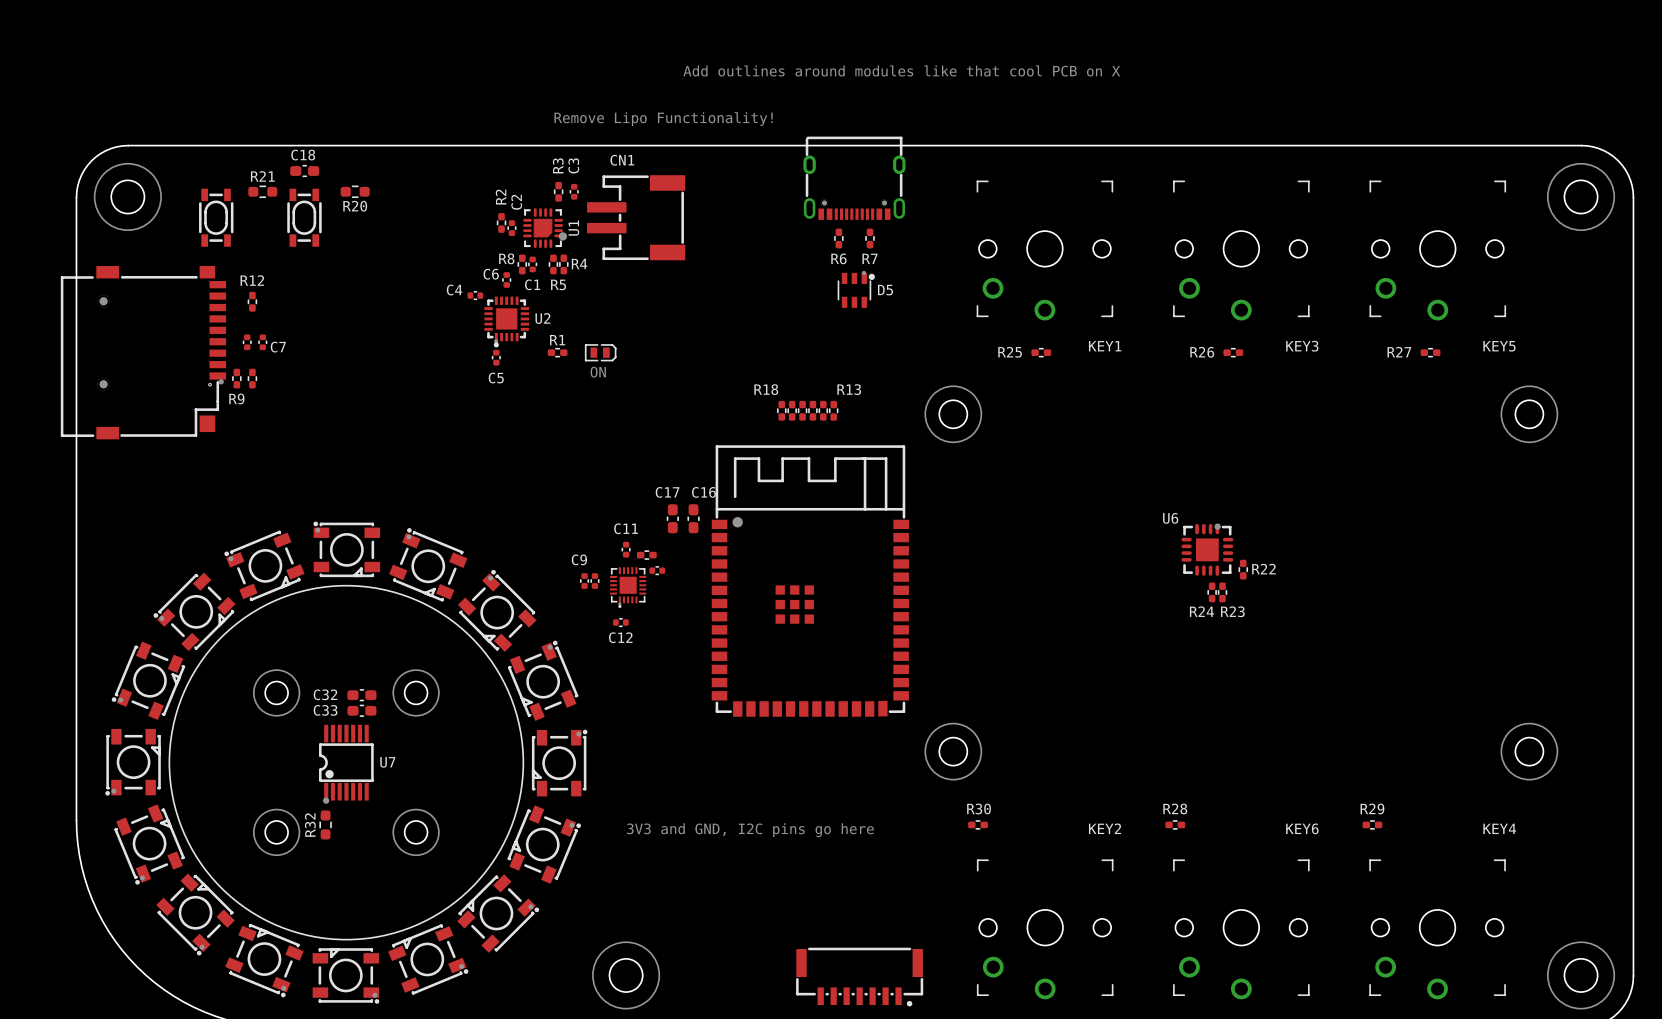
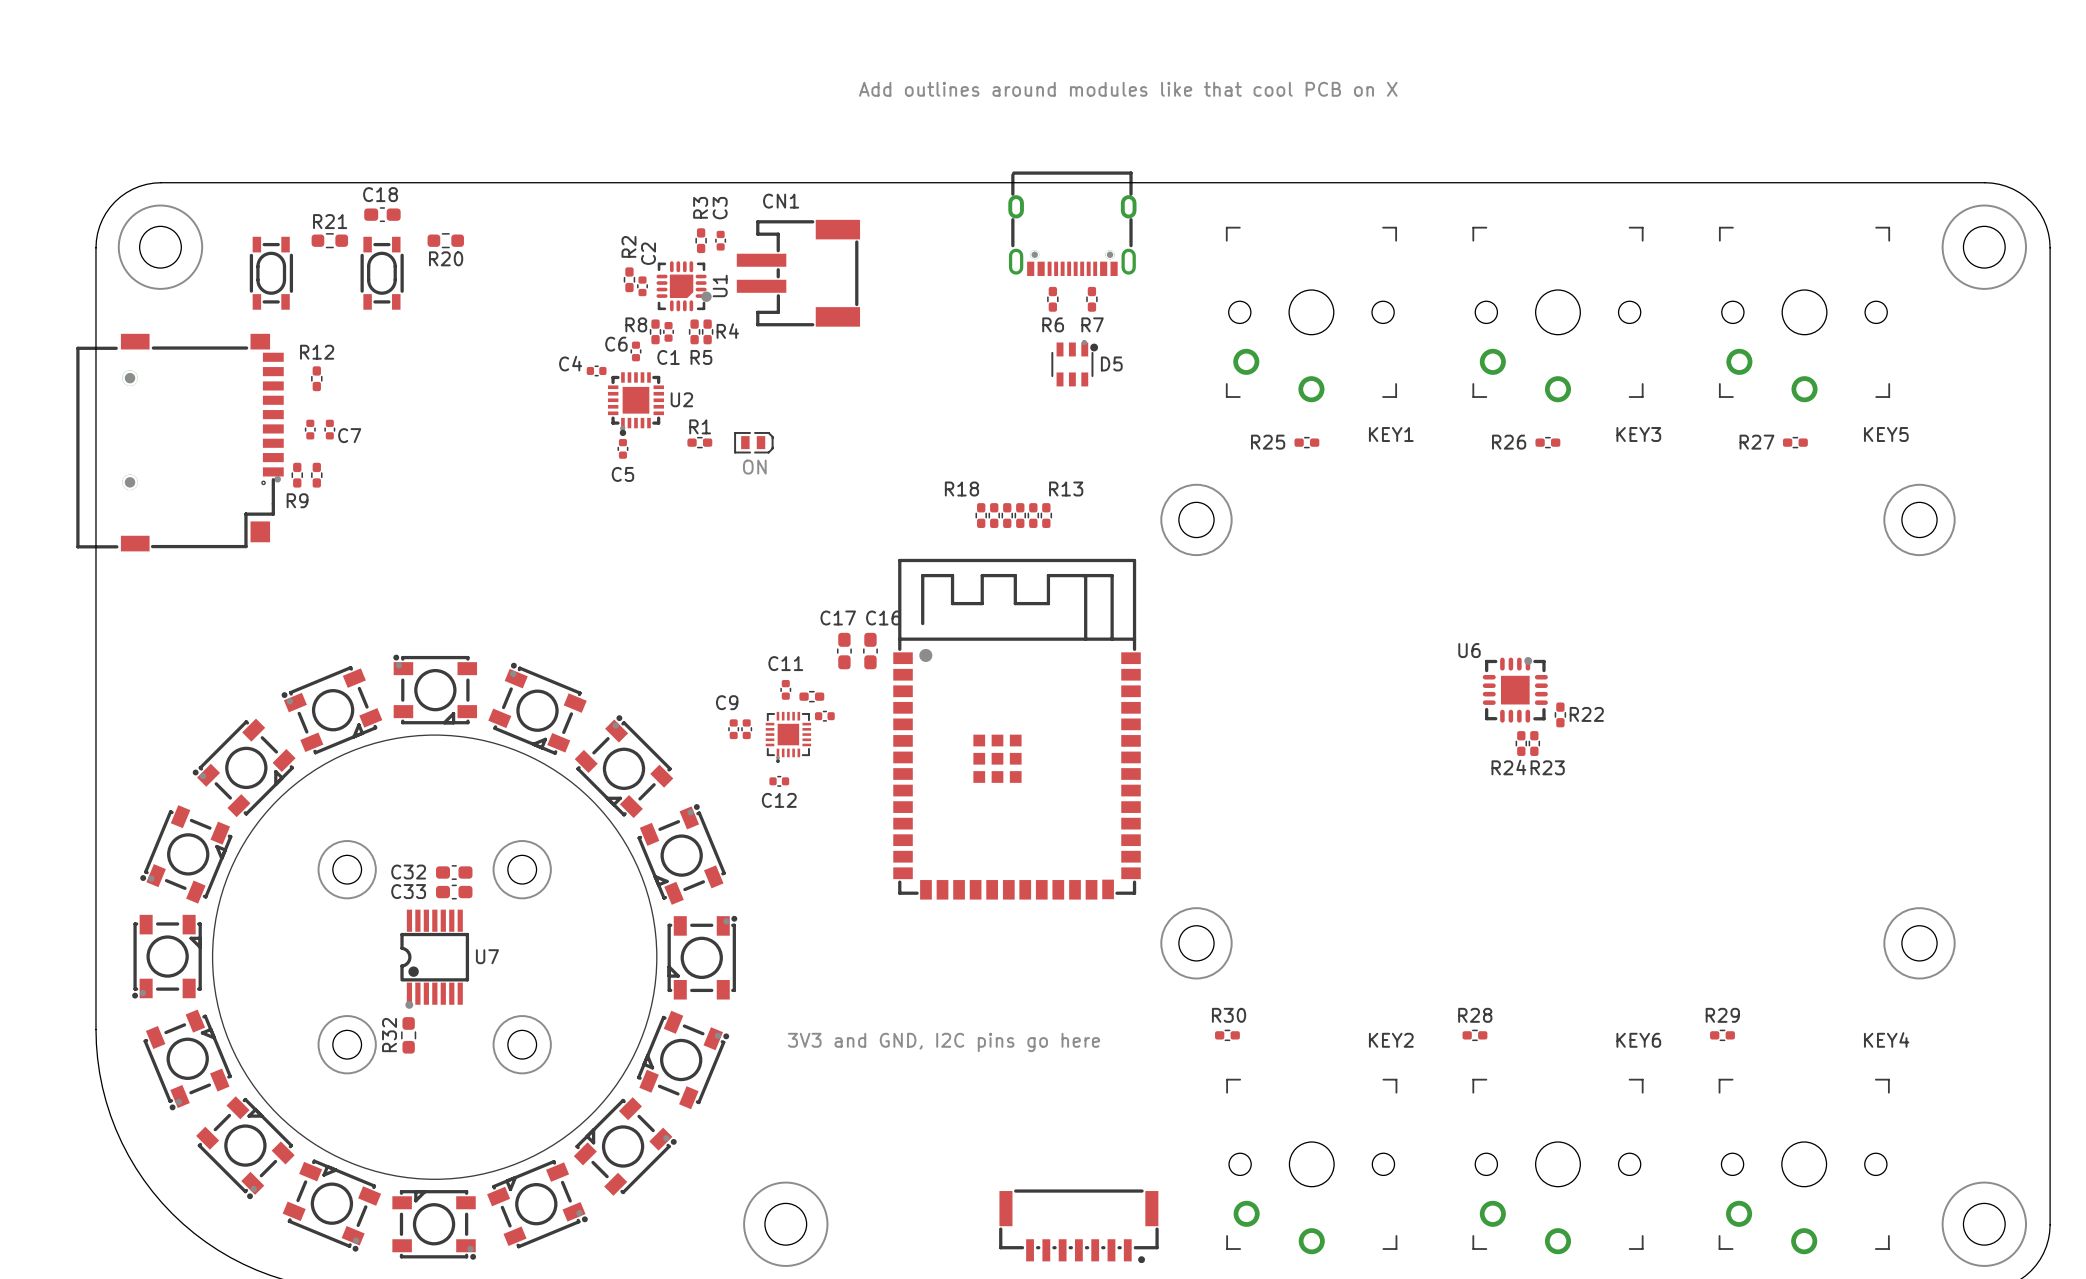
text: Remove Lipo Functionality! (663, 119) -> none

